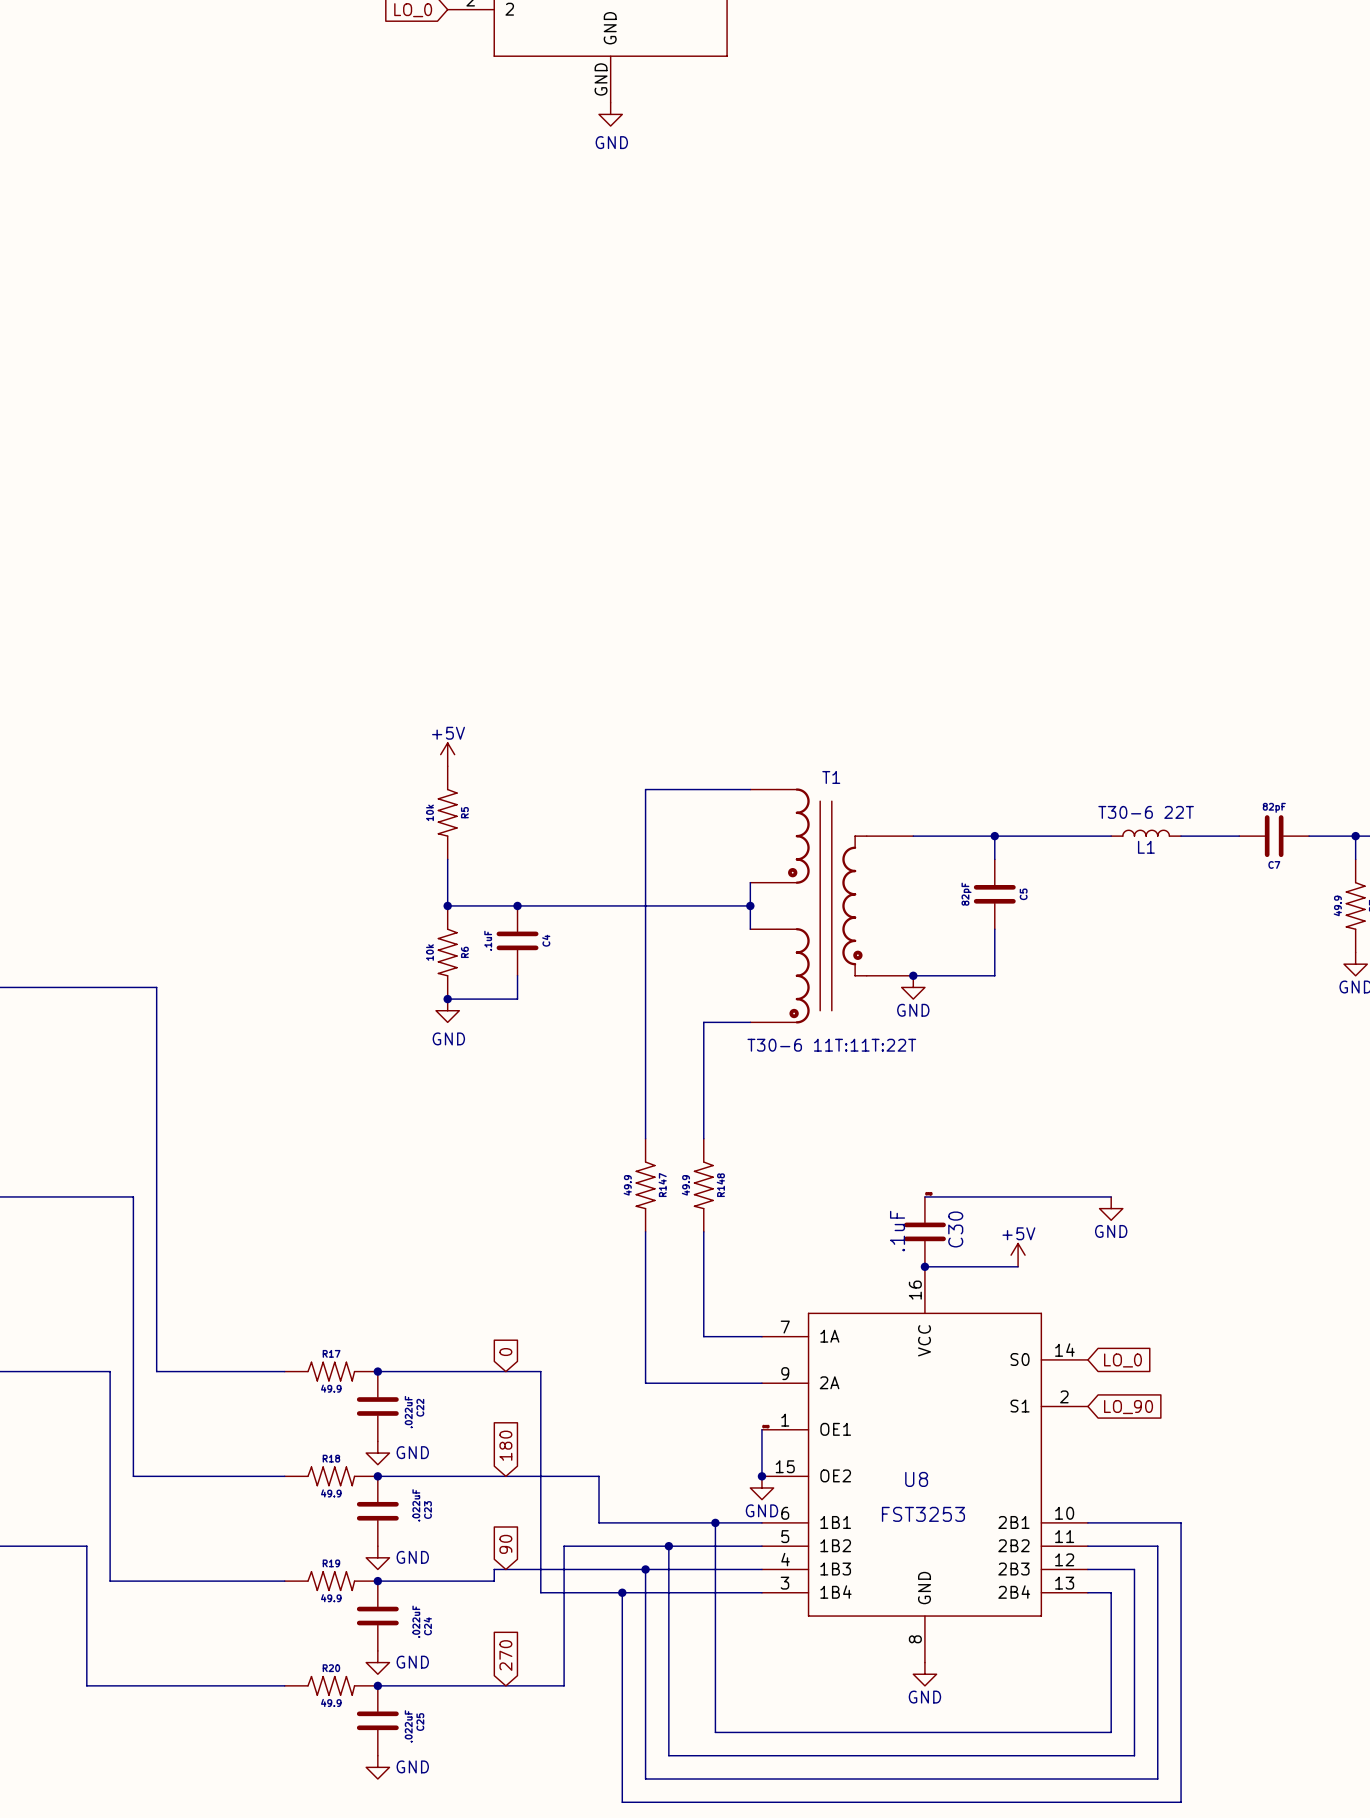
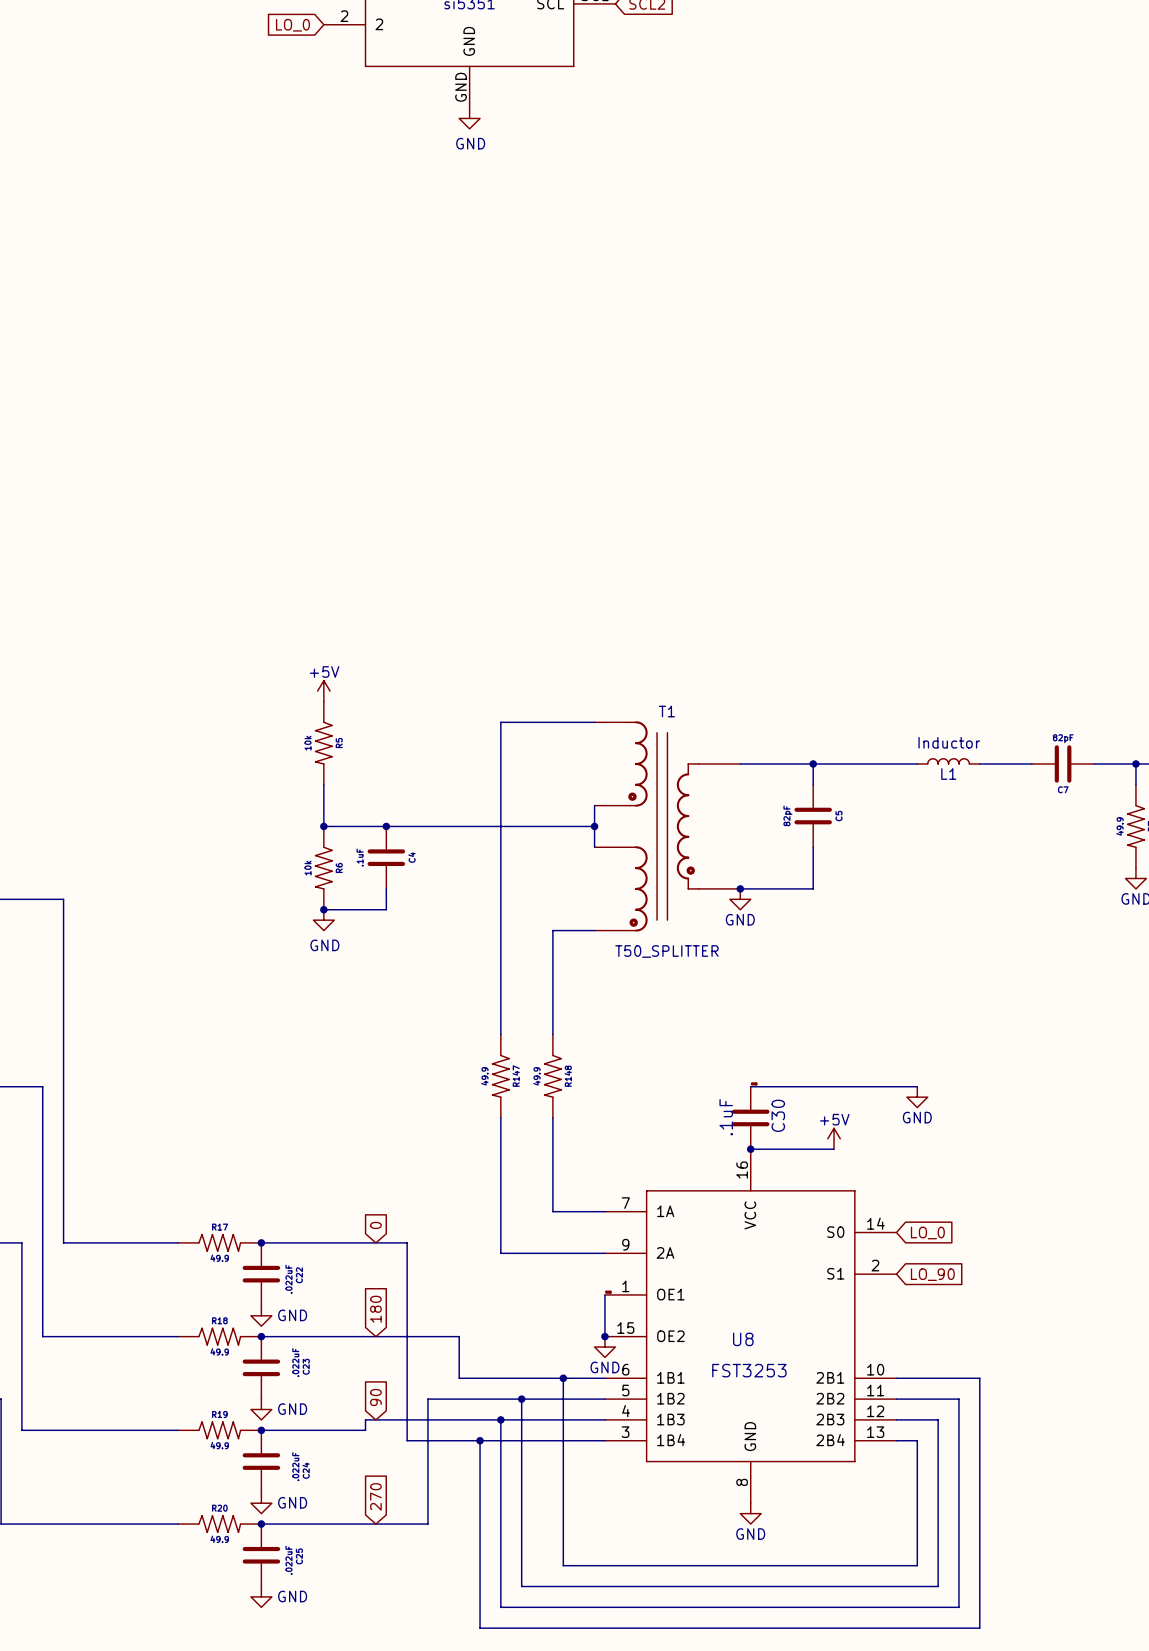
L1 value: T30-6 22T (1146, 812) -> Inductor (949, 742)
T1 value: T30-6 11T:11T:22T (831, 1045) -> T50_SPLITTER (666, 951)

